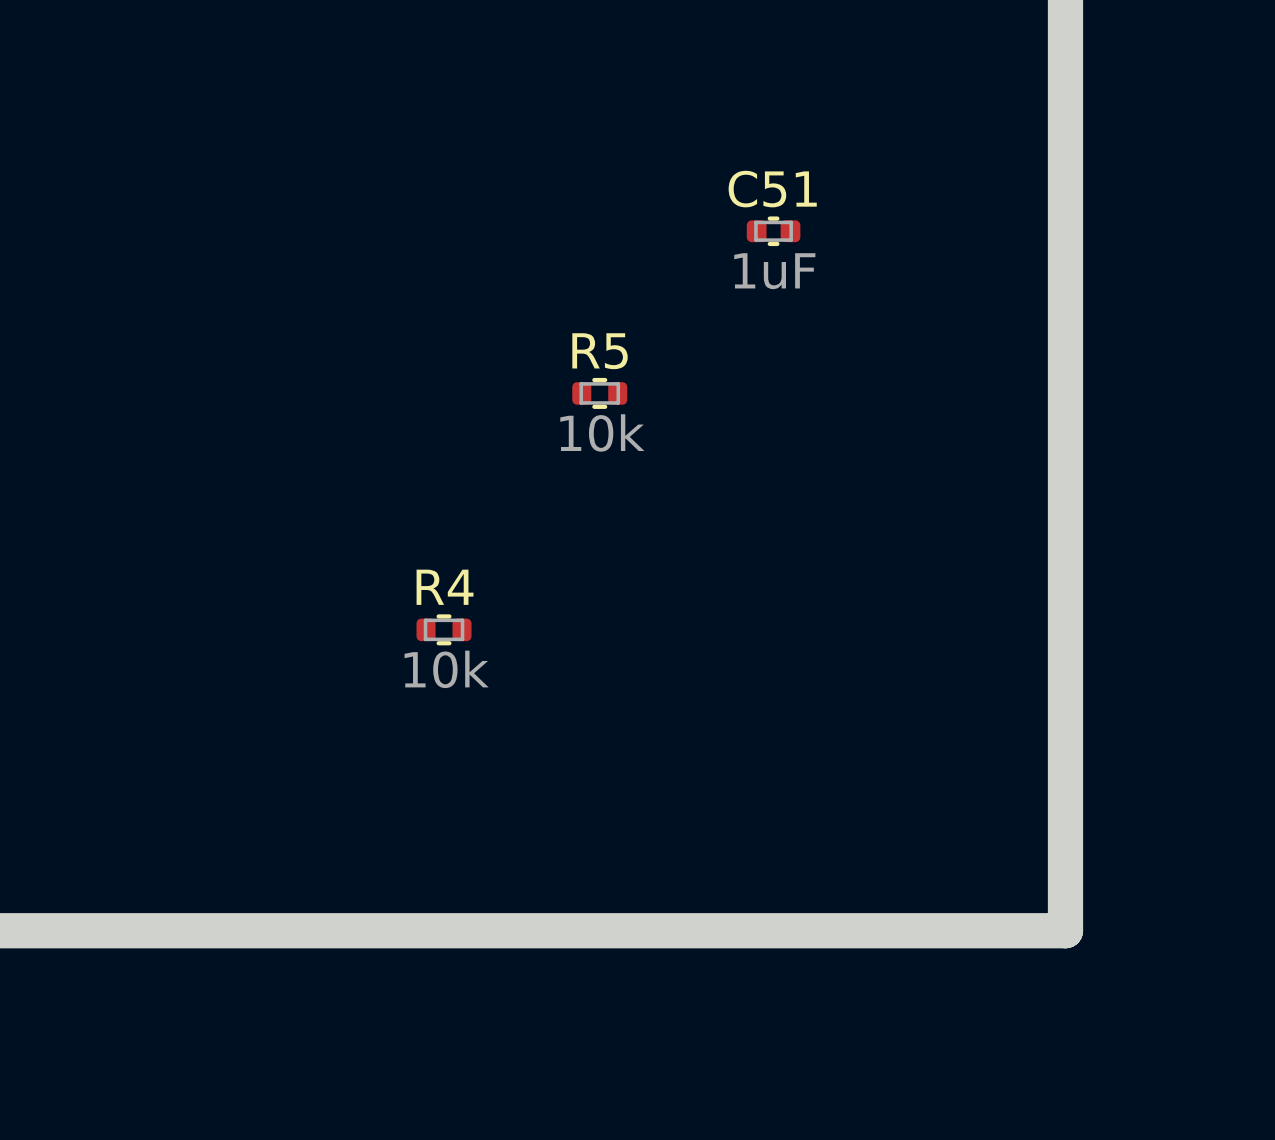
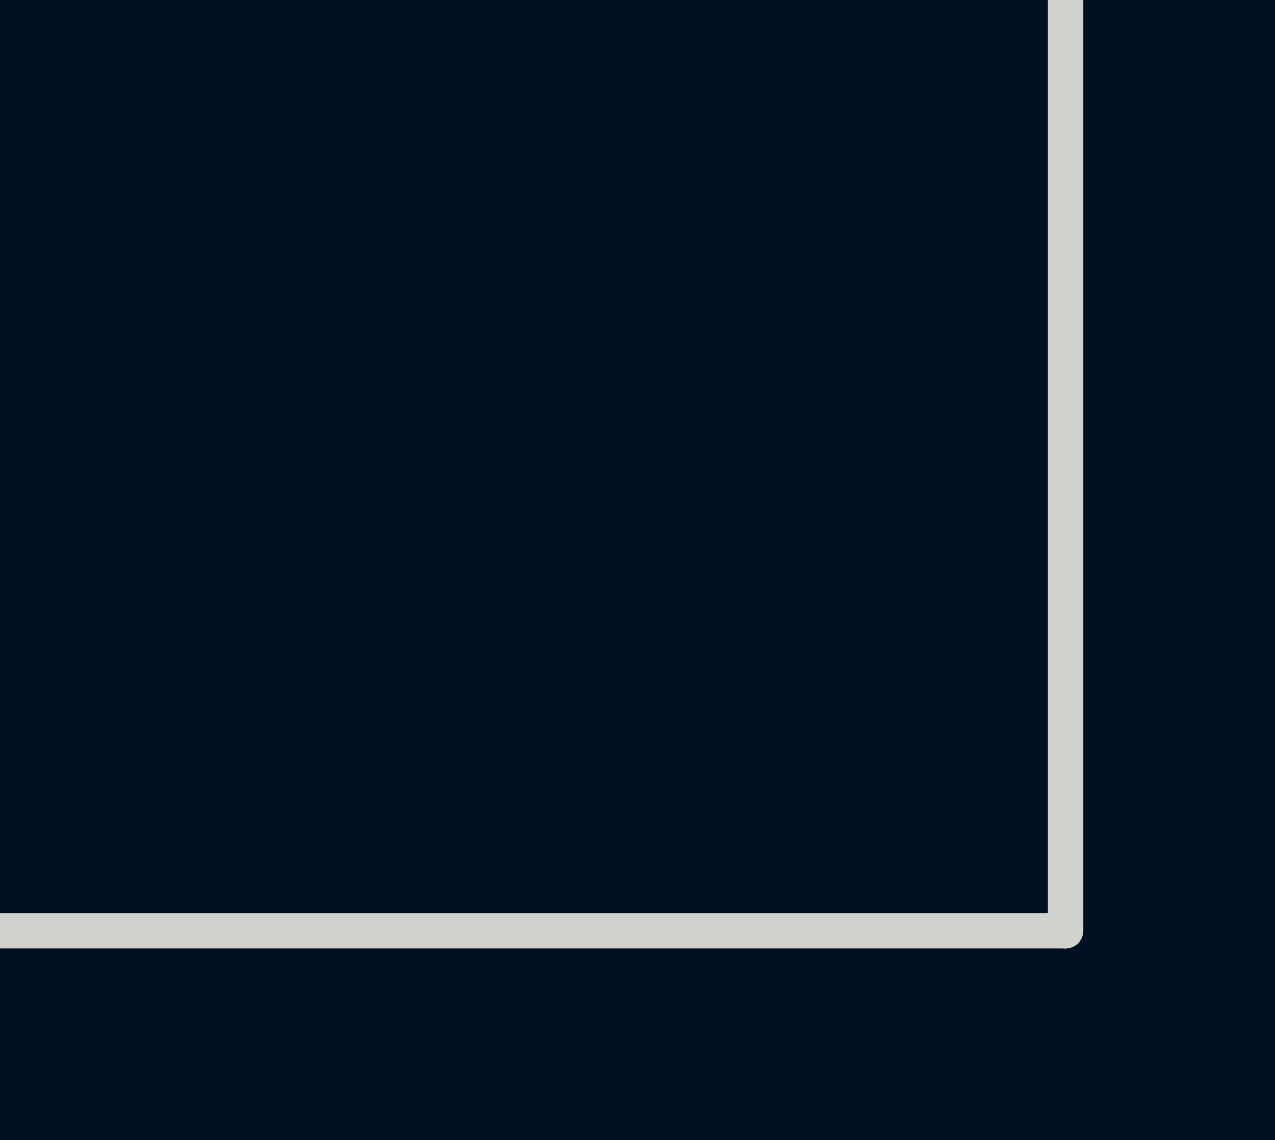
C51: 1uF (773, 231) -> none
R5: 10k (599, 393) -> none
R4: 10k (444, 629) -> none

